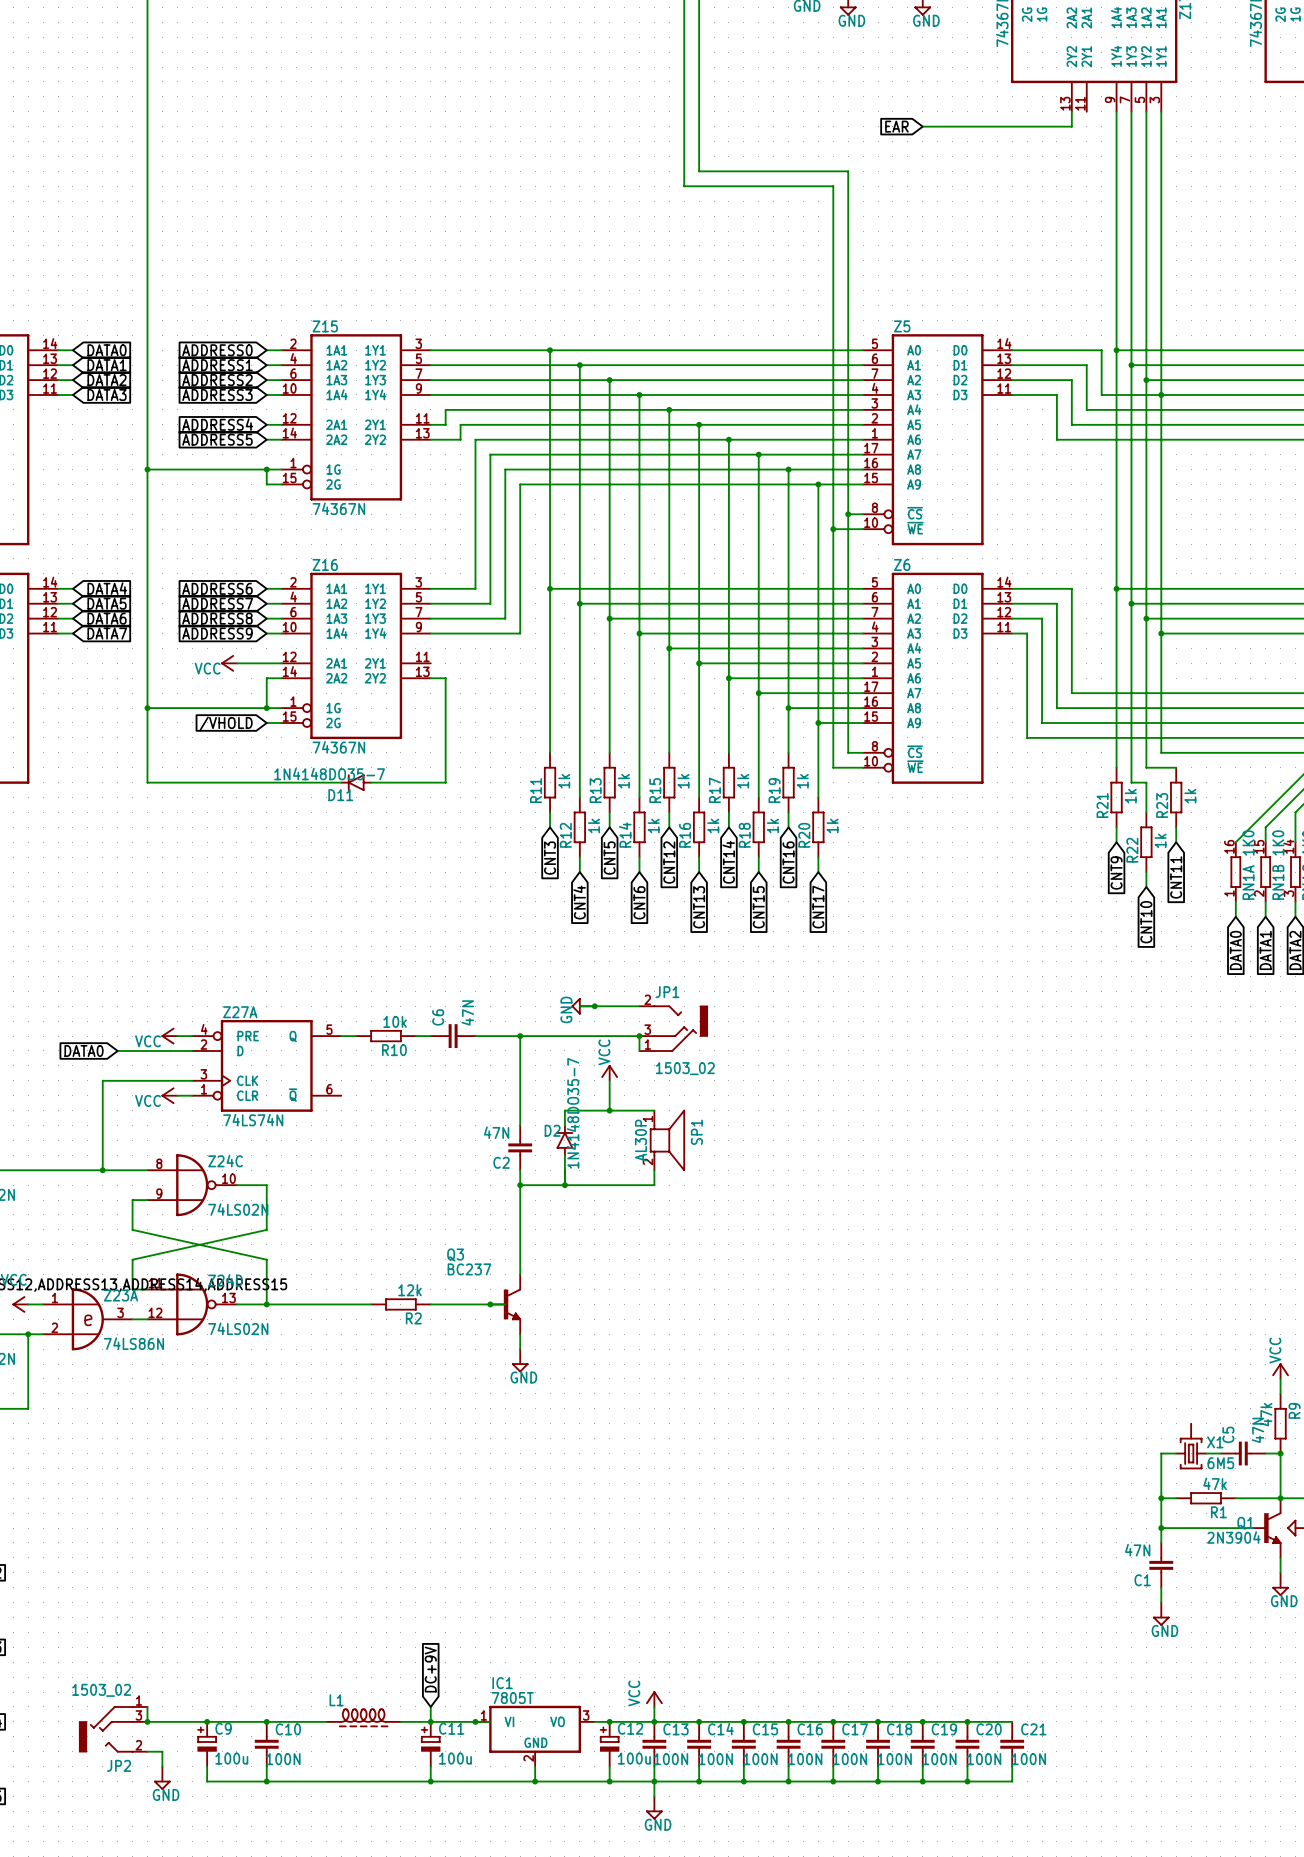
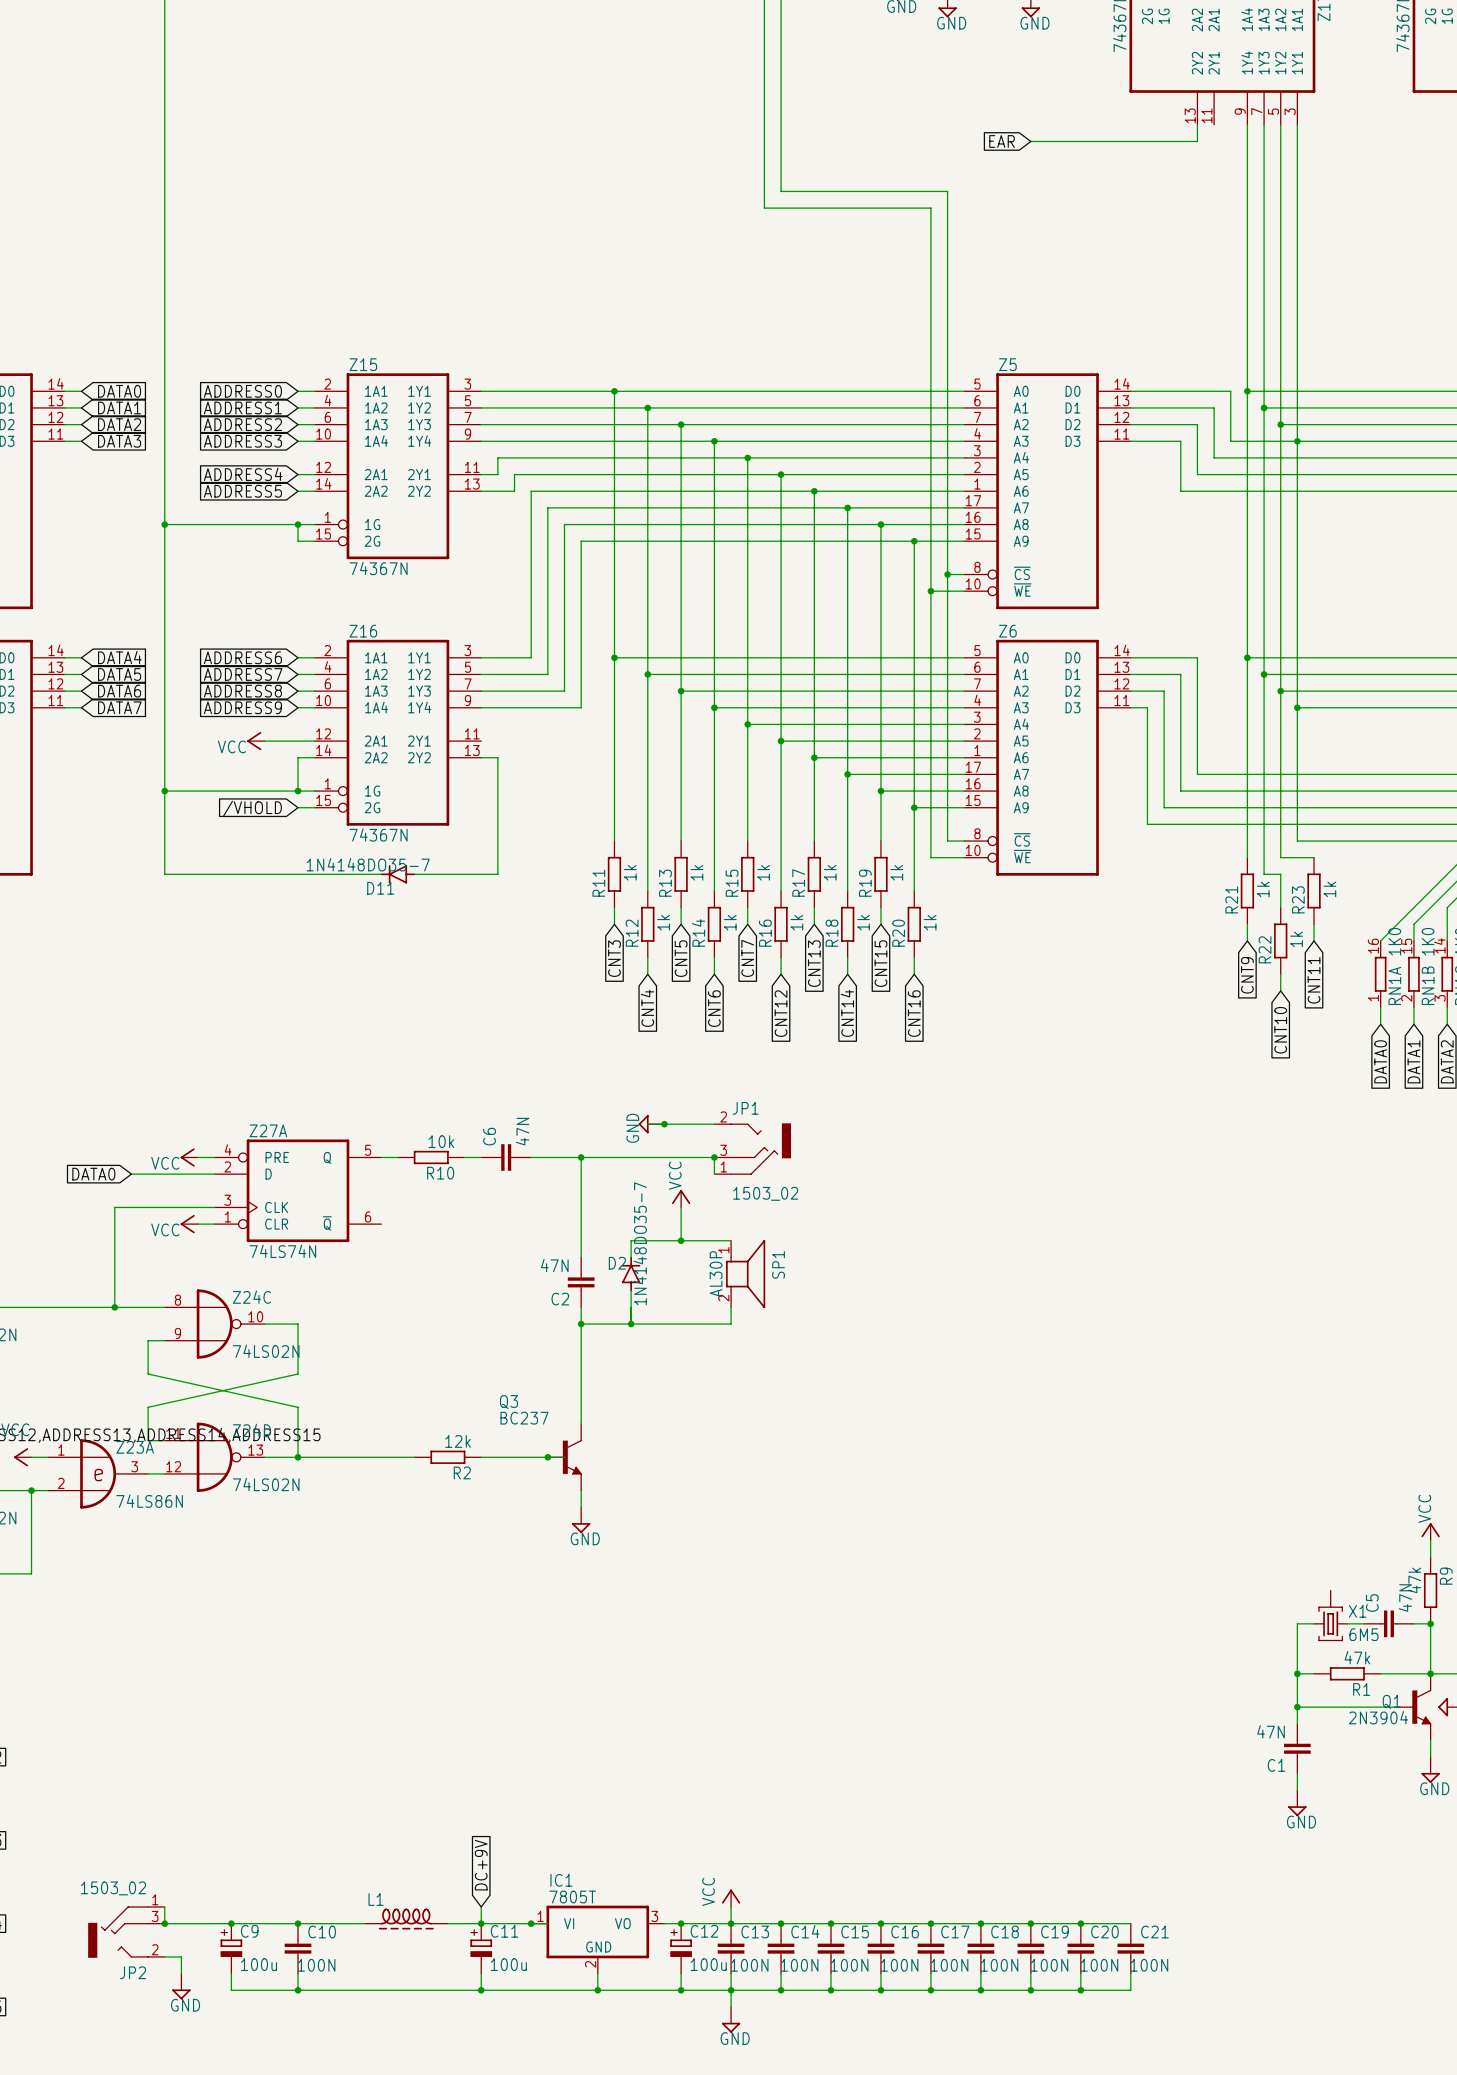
global label: CNT12 (669, 862) -> CNT7 (747, 958)
global label: CNT14 (728, 862) -> CNT13 (814, 963)
global label: CNT16 (788, 862) -> CNT15 (880, 963)
global label: CNT13 (699, 907) -> CNT12 (781, 1013)
global label: CNT15 (758, 907) -> CNT14 (847, 1013)
global label: CNT17 (818, 907) -> CNT16 (914, 1013)

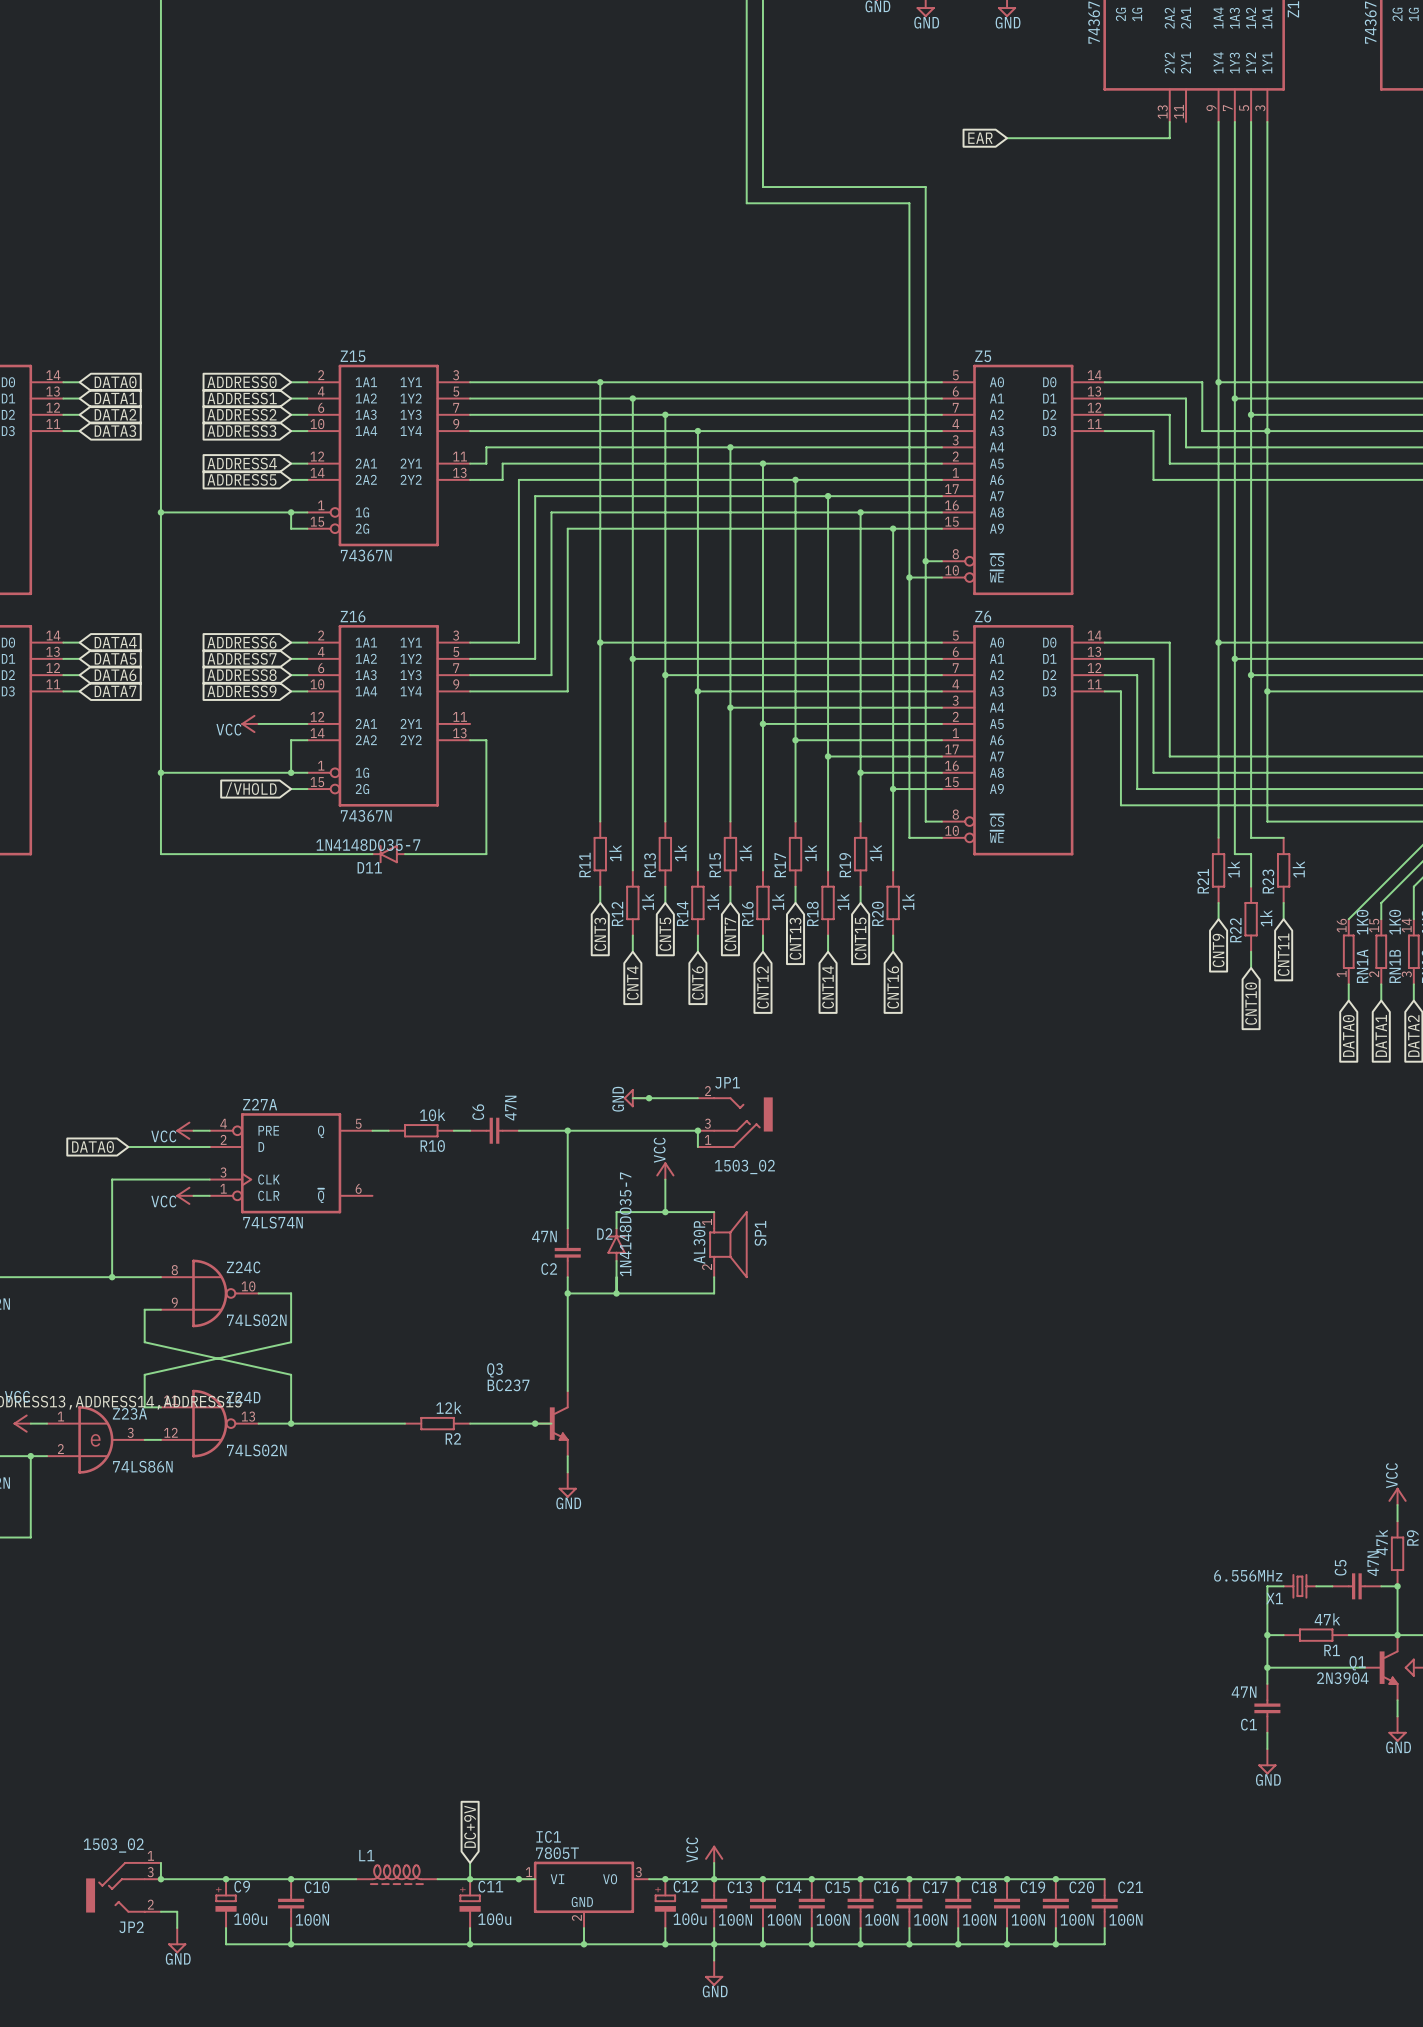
X1 symbol: [1313, 1590, 1348, 1642] -> [1283, 1574, 1317, 1599]
X1 name position: X1 (1357, 1611) -> X1 (1274, 1598)
X1 value: 6M5 (1363, 1634) -> 6.556MHz (1248, 1575)

